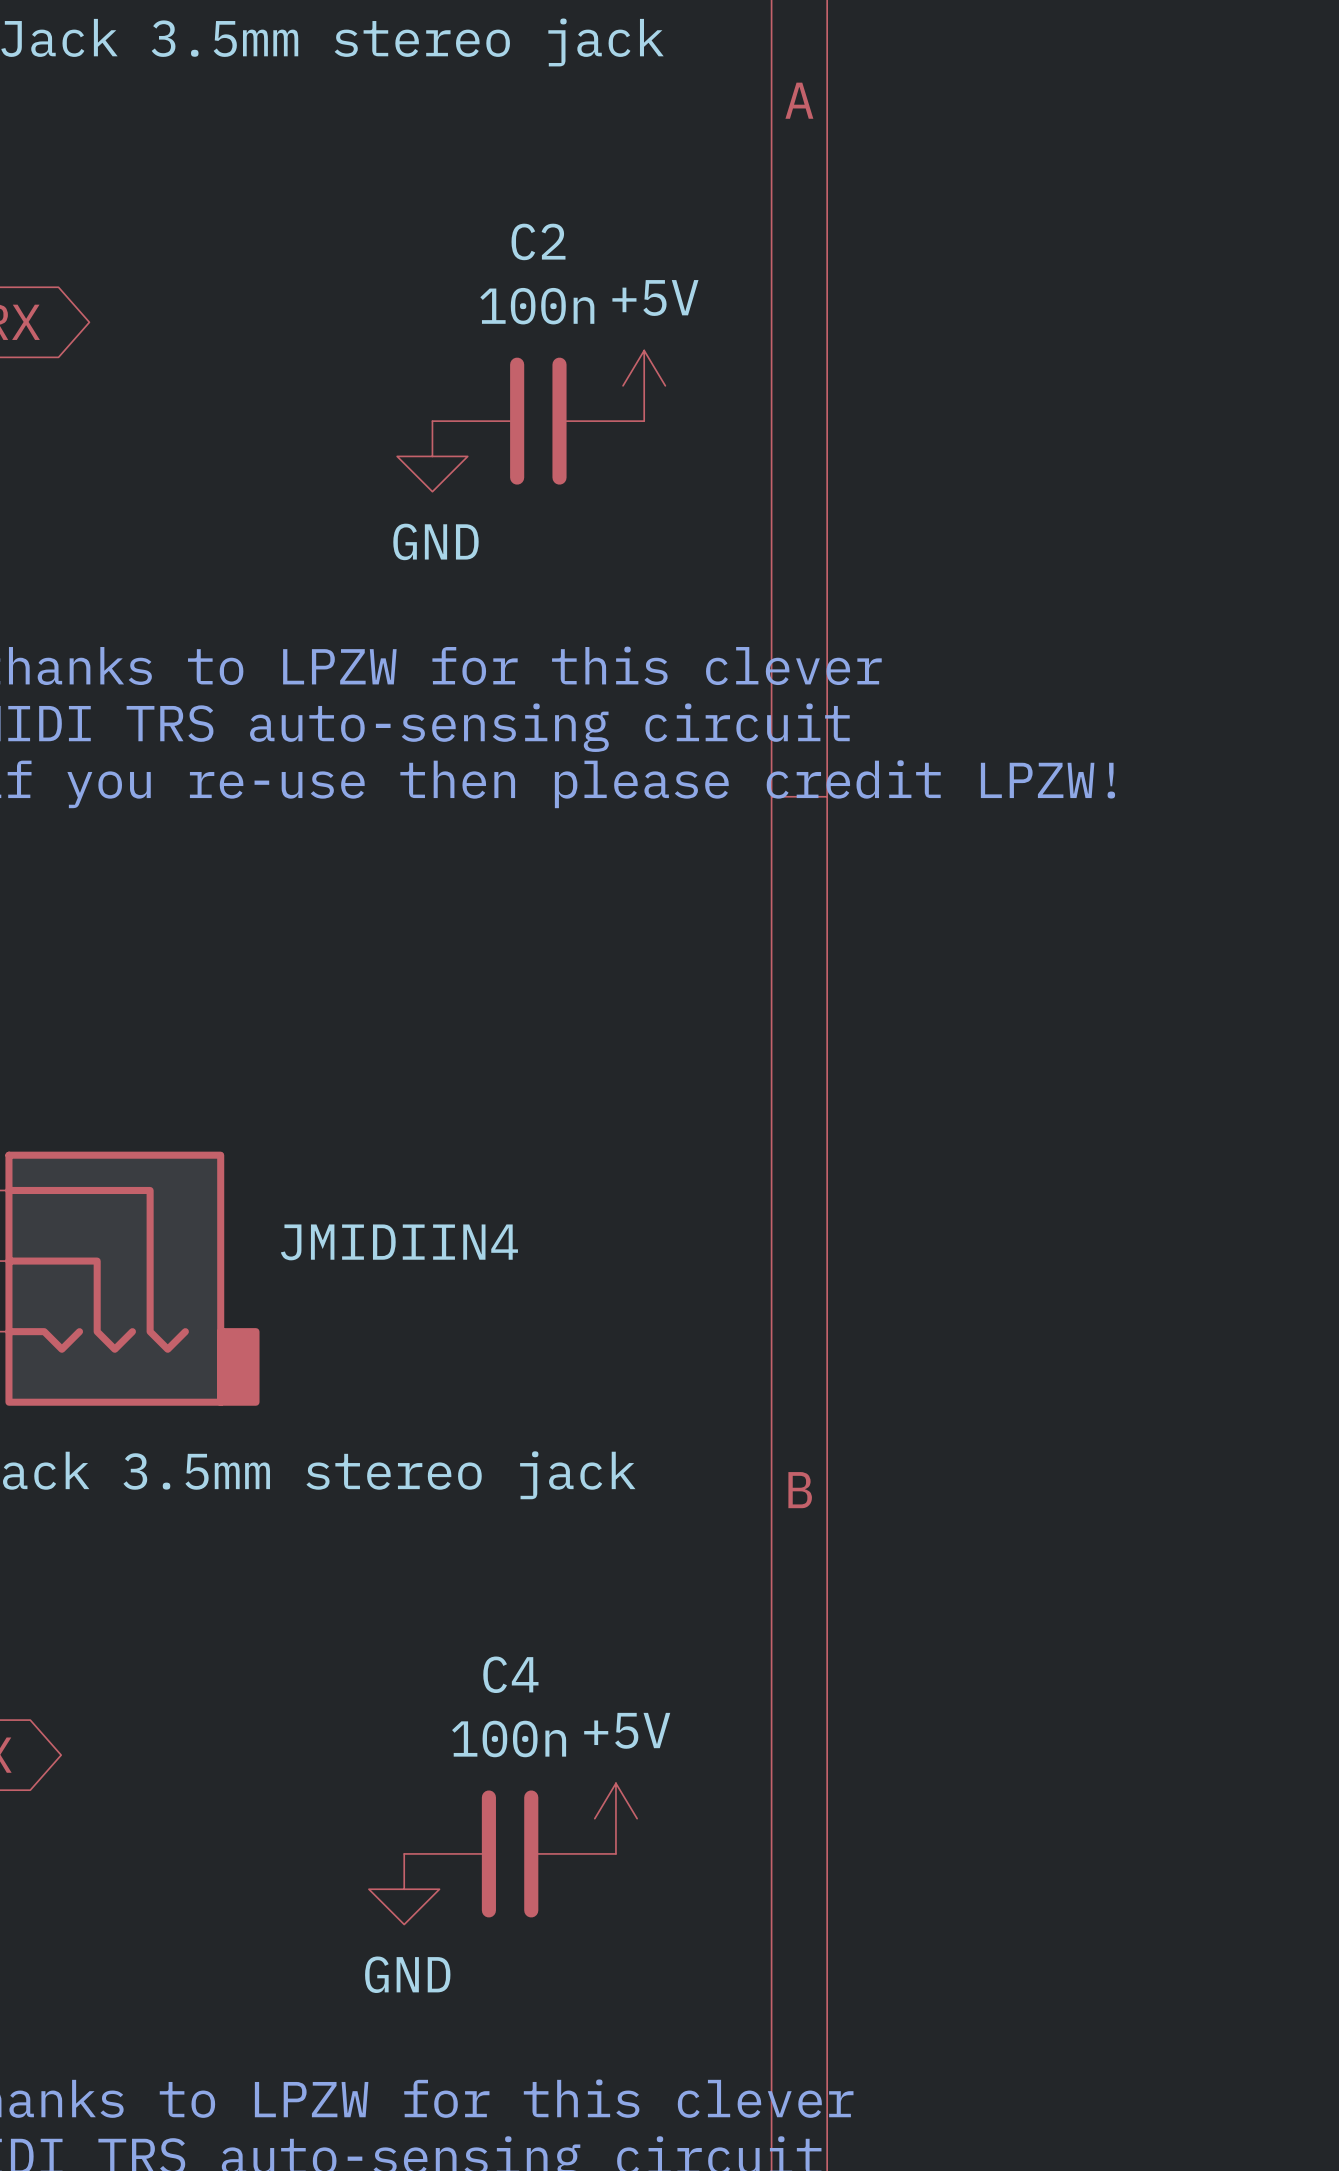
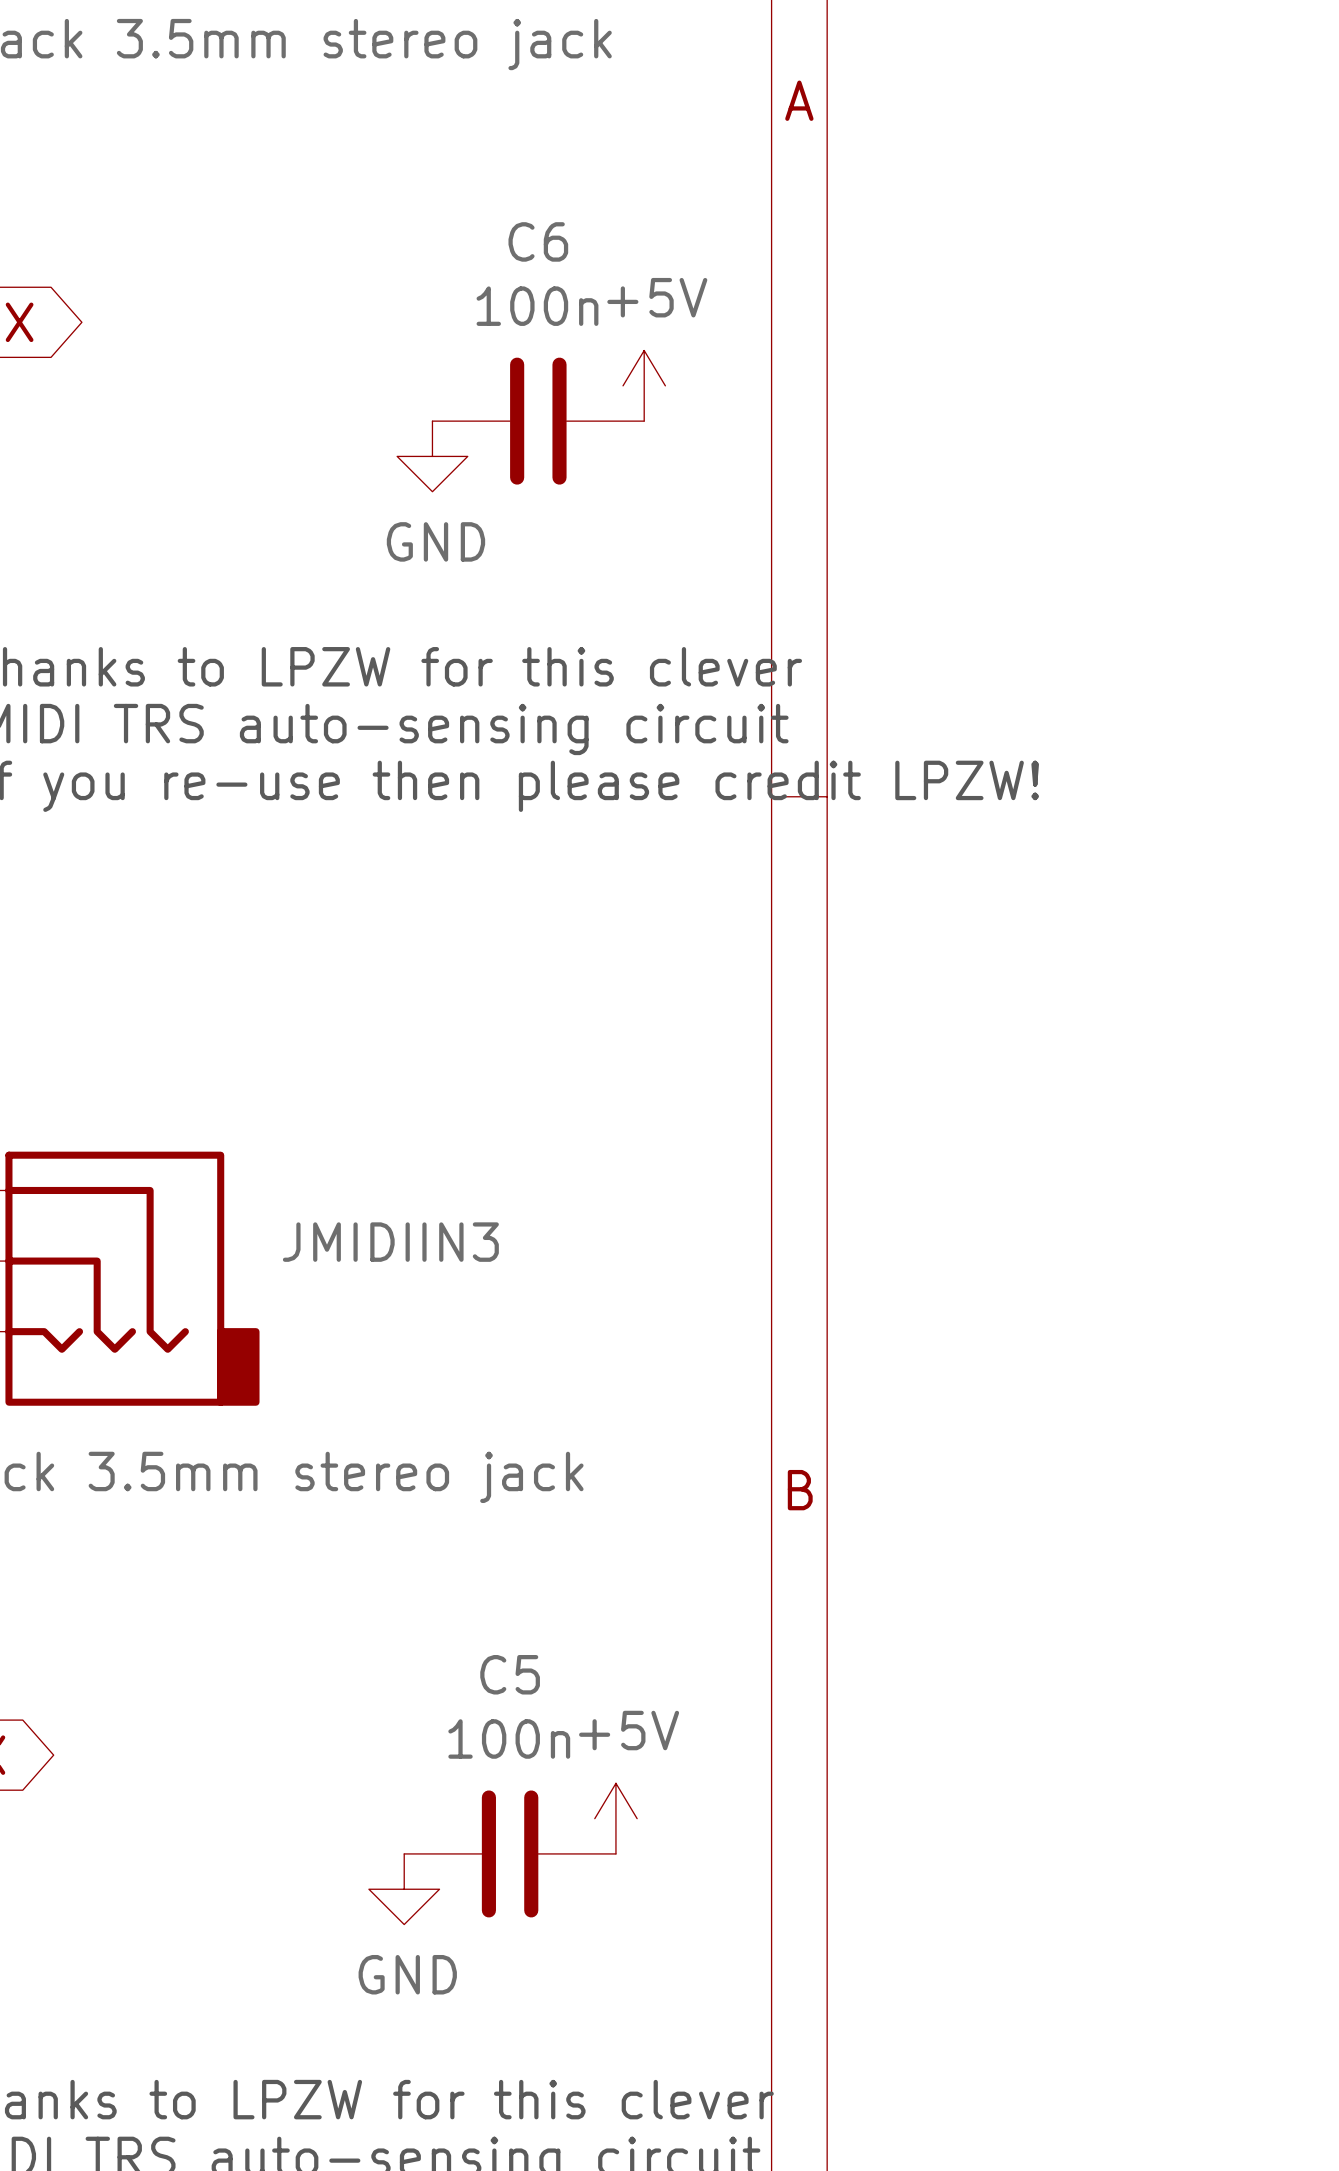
C2 name: C2 (538, 241) -> C6 (538, 241)
JMIDIIN4 name: JMIDIIN4 (399, 1242) -> JMIDIIN3 (390, 1242)
C4 name: C4 (510, 1674) -> C5 (510, 1674)

